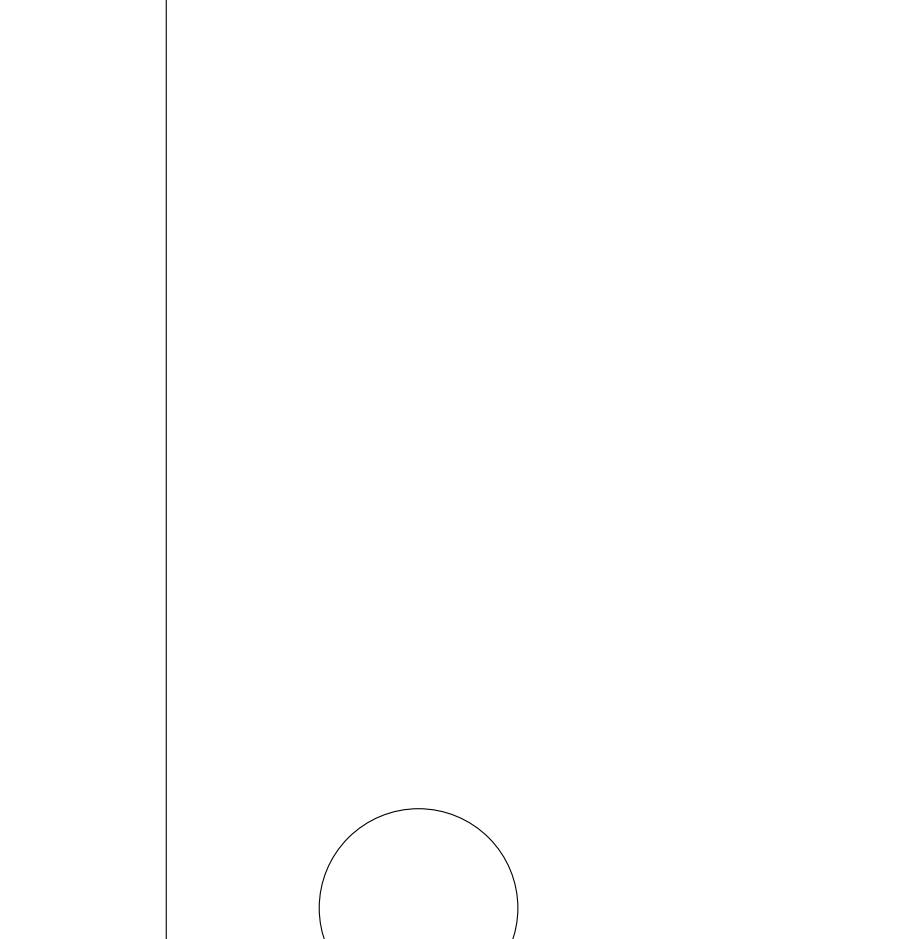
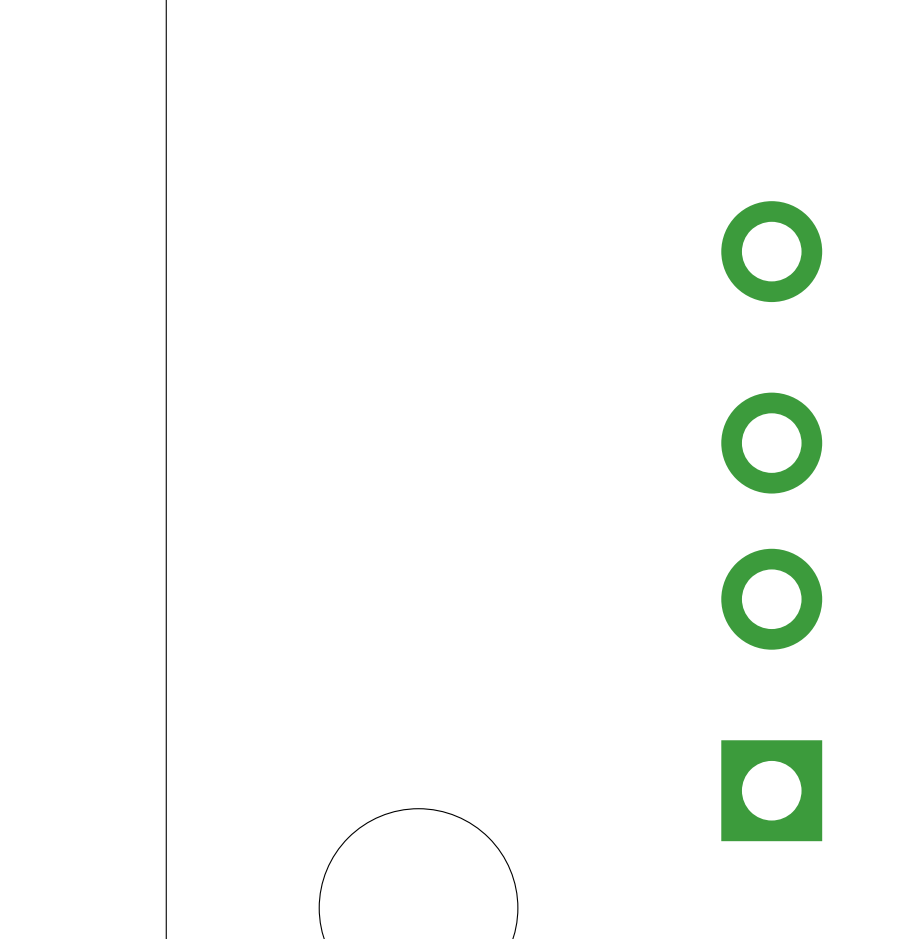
part: none -> (771, 521)

